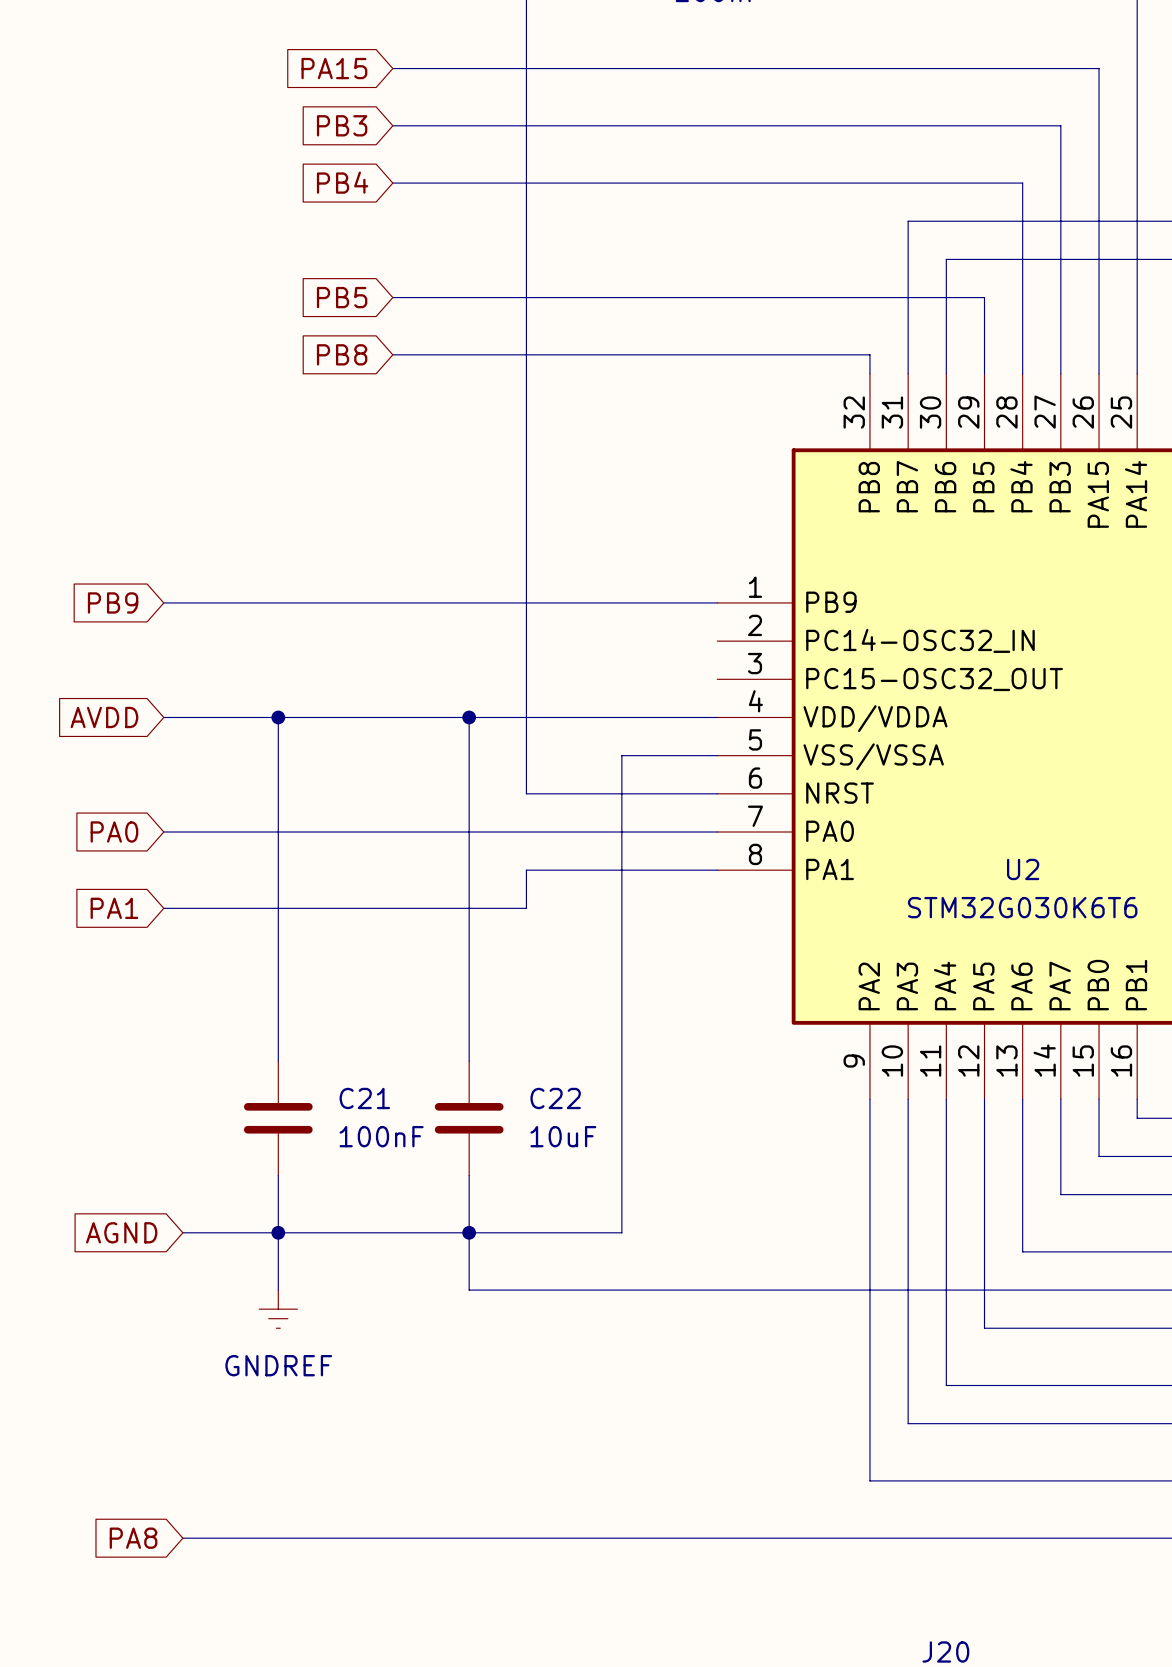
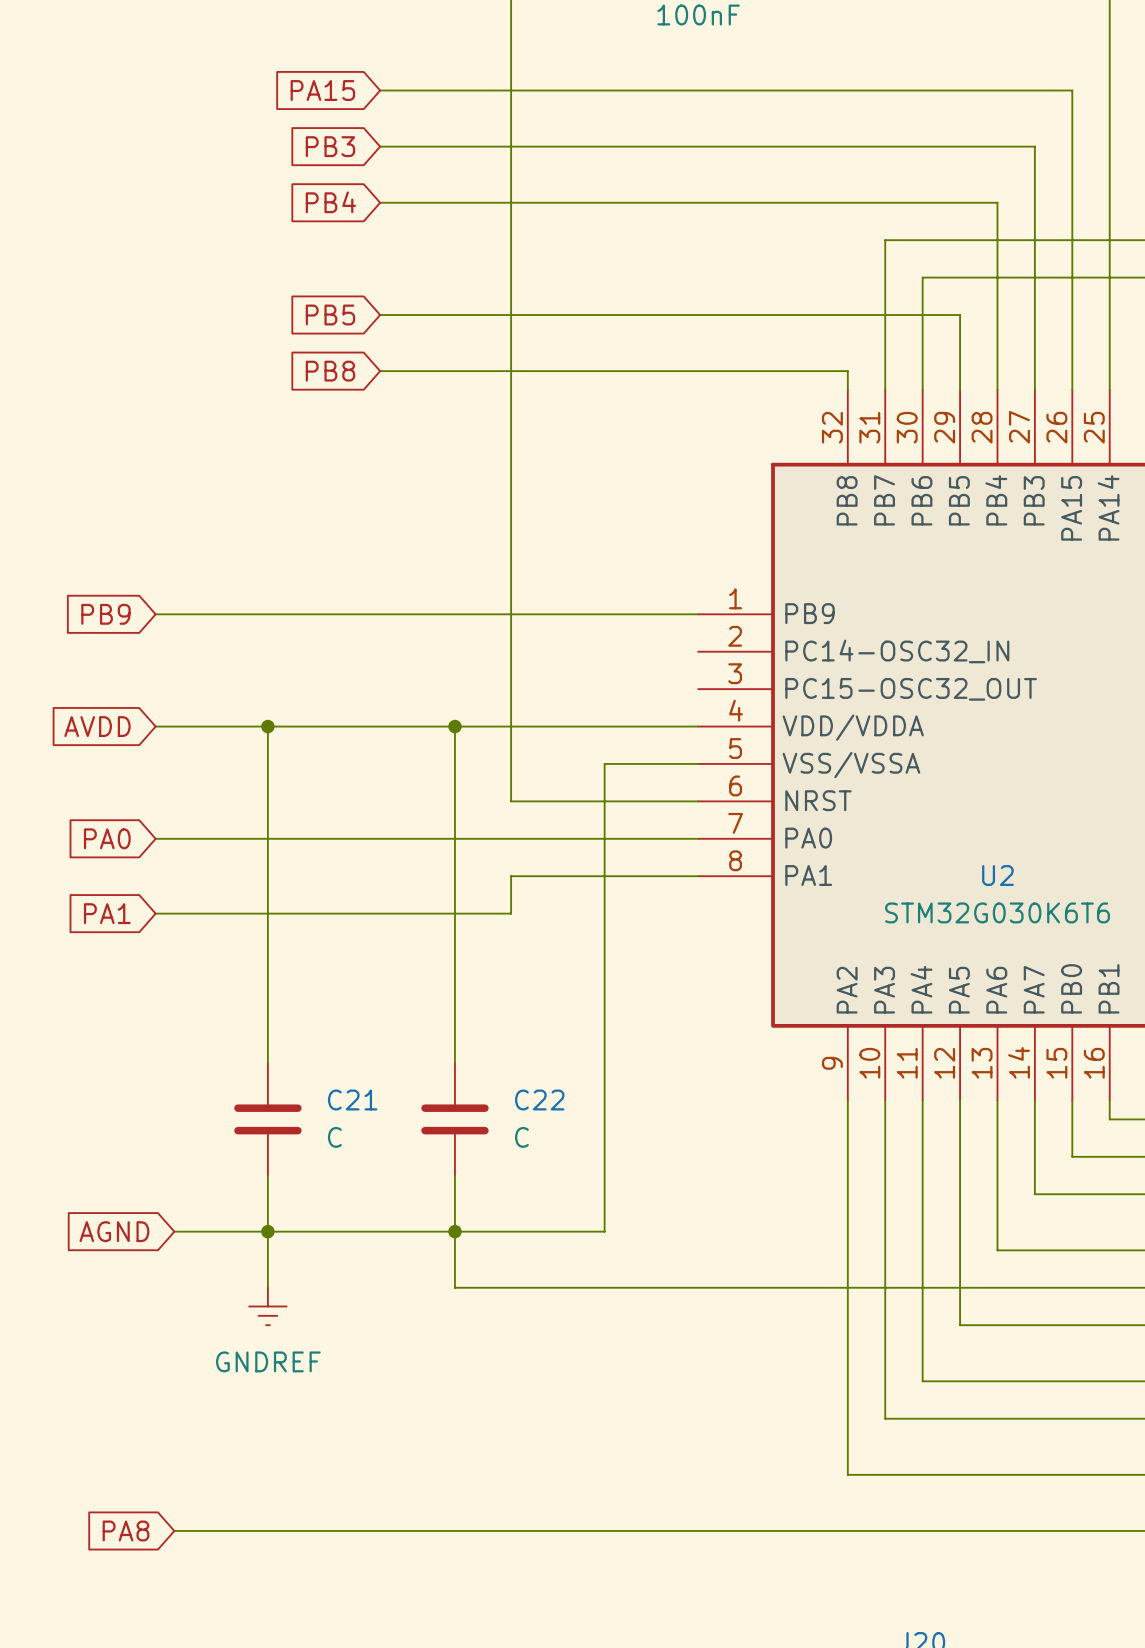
C21 value: 100nF (381, 1136) -> C (334, 1137)
C22 value: 10uF (563, 1136) -> C (521, 1137)

